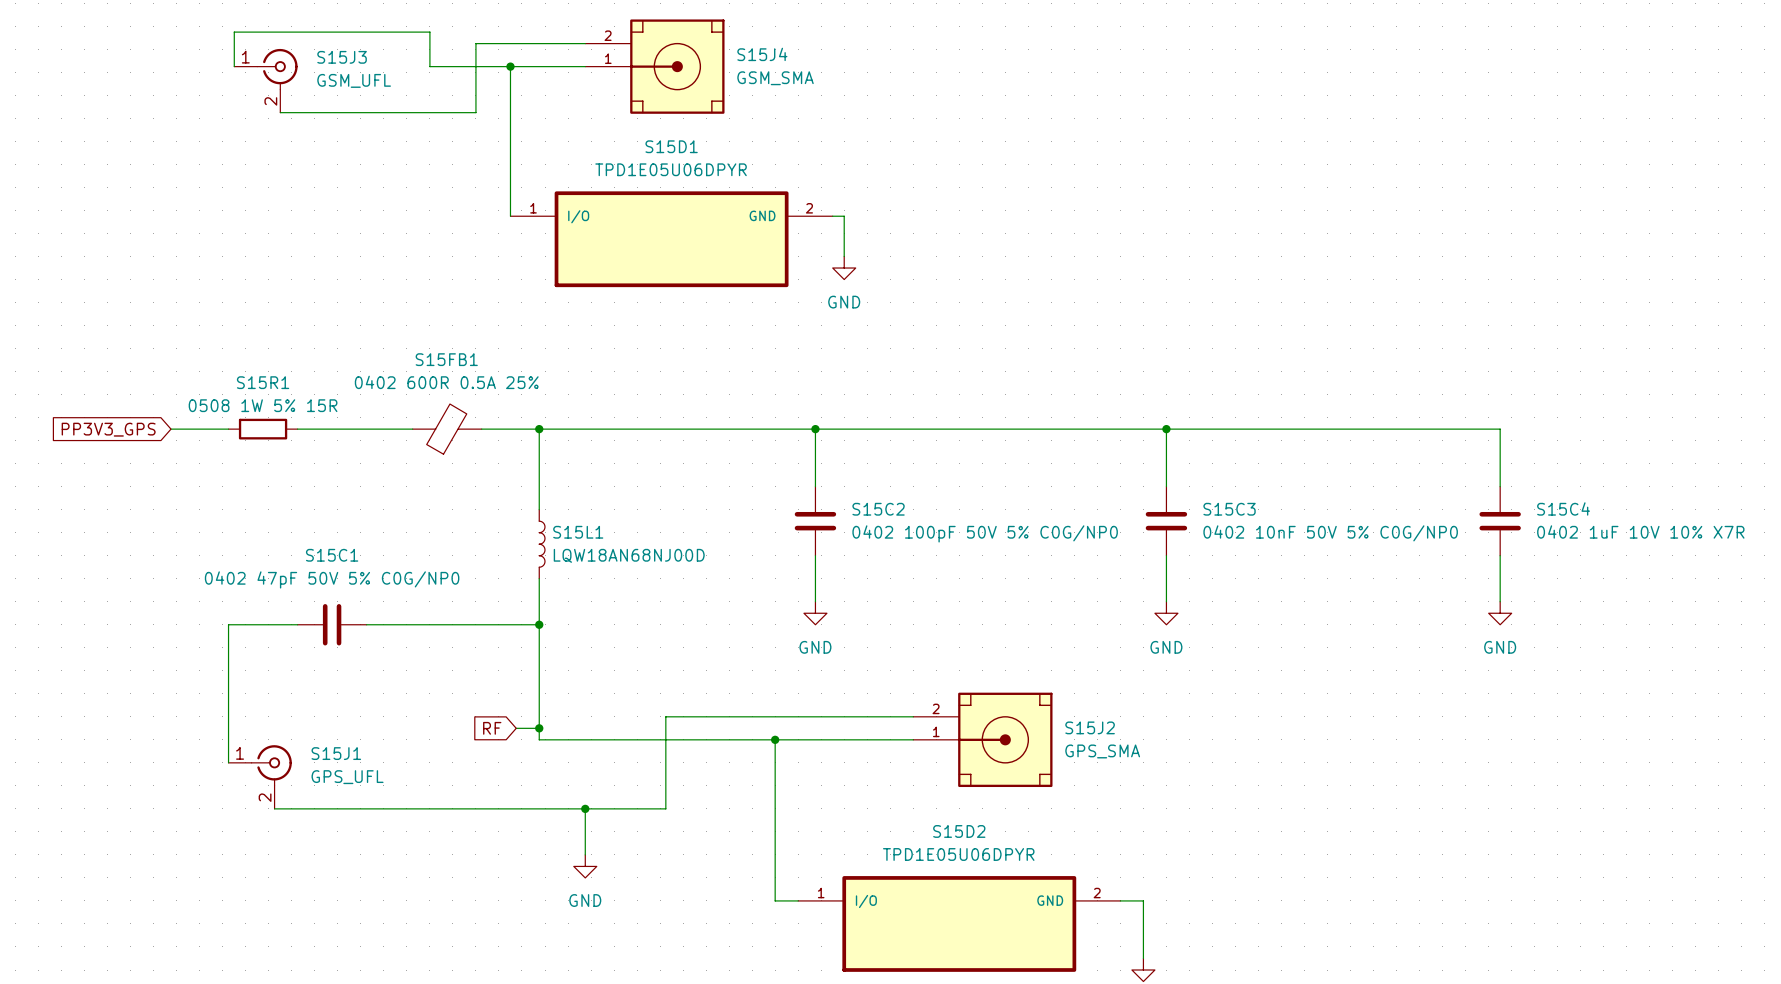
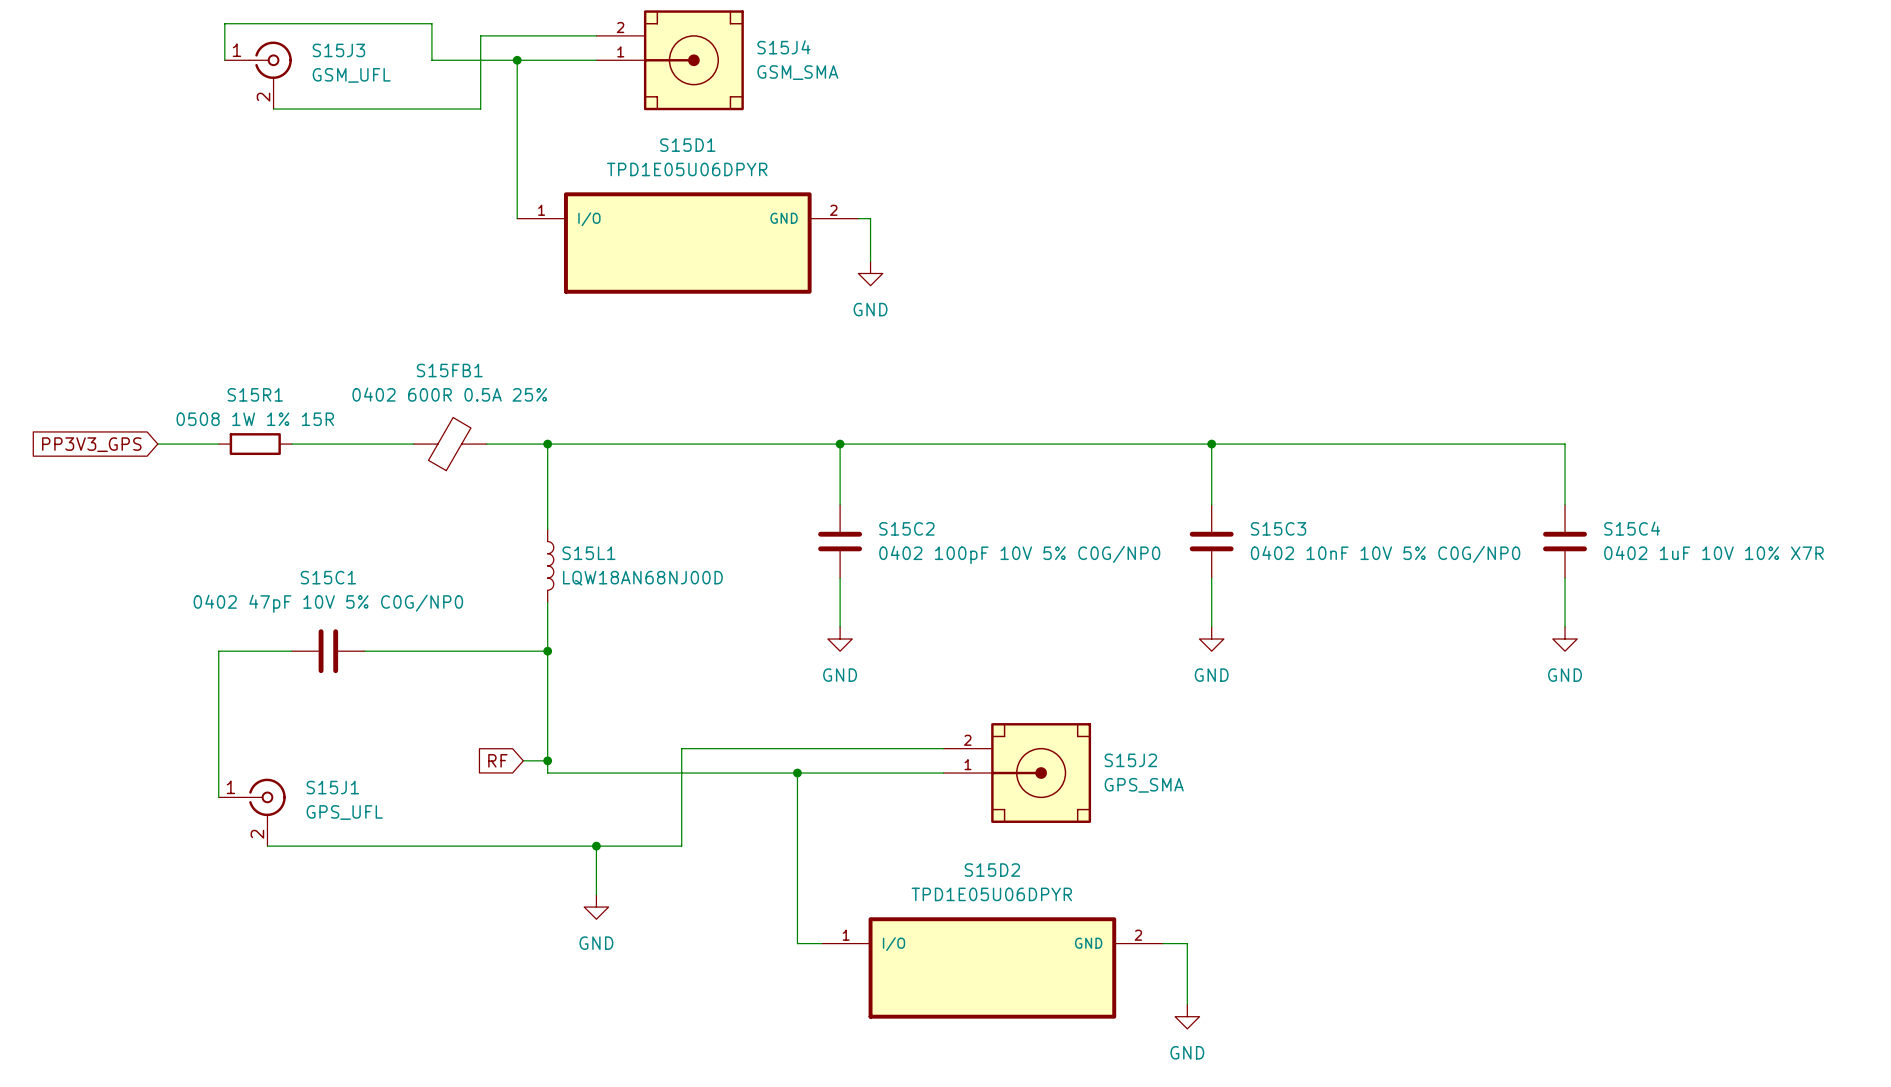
S15R1 value: 0508 1W 5% 15R (263, 405) -> 0508 1W 1% 15R (255, 419)
S15C2 value: 0402 100pF 50V 5% C0G/NP0 (985, 533) -> 0402 100pF 10V 5% C0G/NP0 (1019, 555)
S15C3 value: 0402 10nF 50V 5% C0G/NP0 (1330, 533) -> 0402 10nF 10V 5% C0G/NP0 (1385, 554)
S15C1 value: 0402 47pF 50V 5% C0G/NP0 (332, 579) -> 0402 47pF 10V 5% C0G/NP0 (328, 603)

